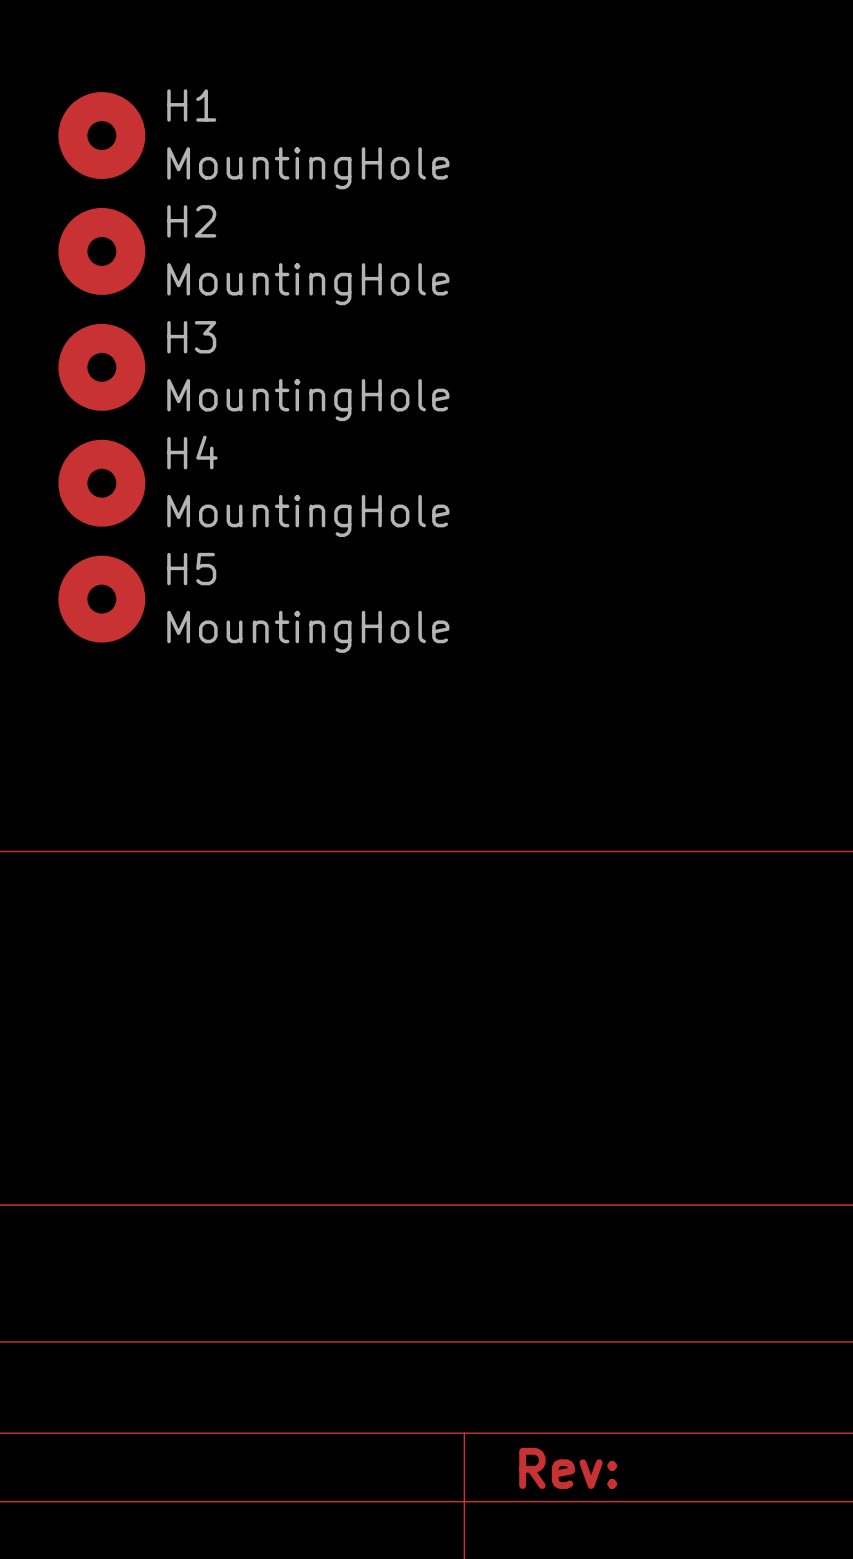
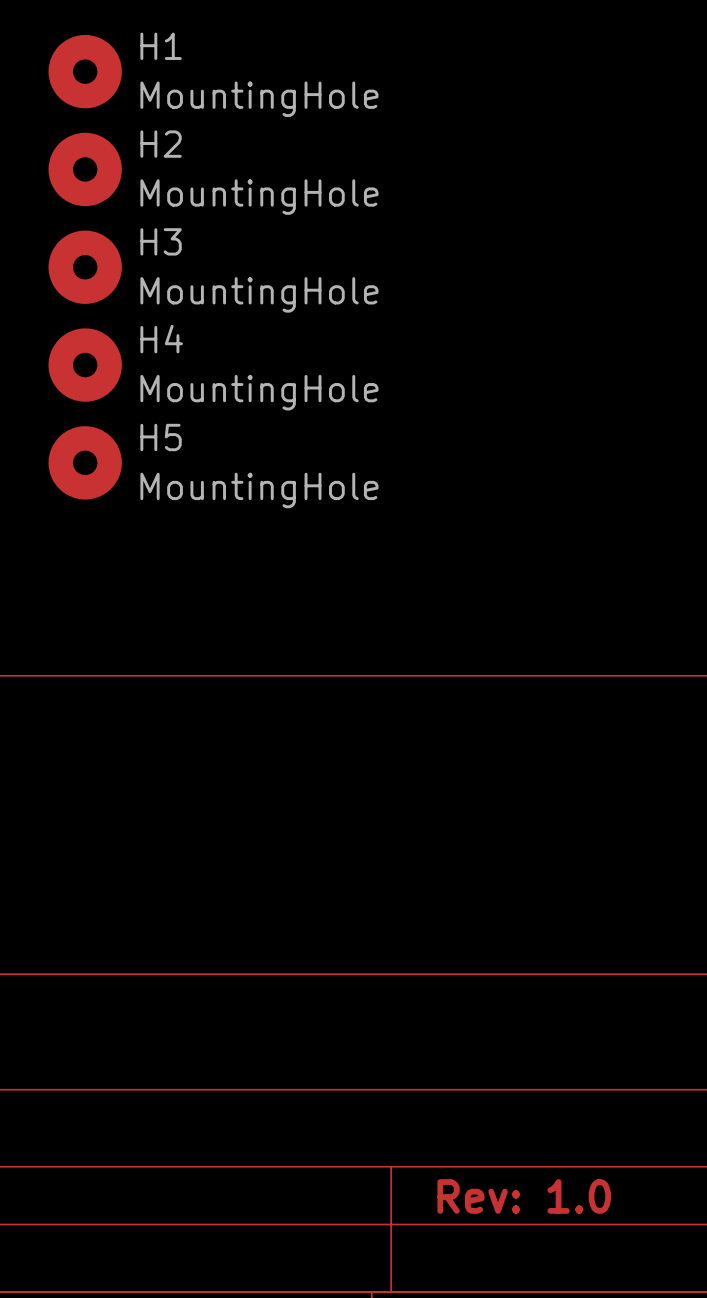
title block: Rev: (568, 1468) -> Rev: 1.0 (524, 1196)

